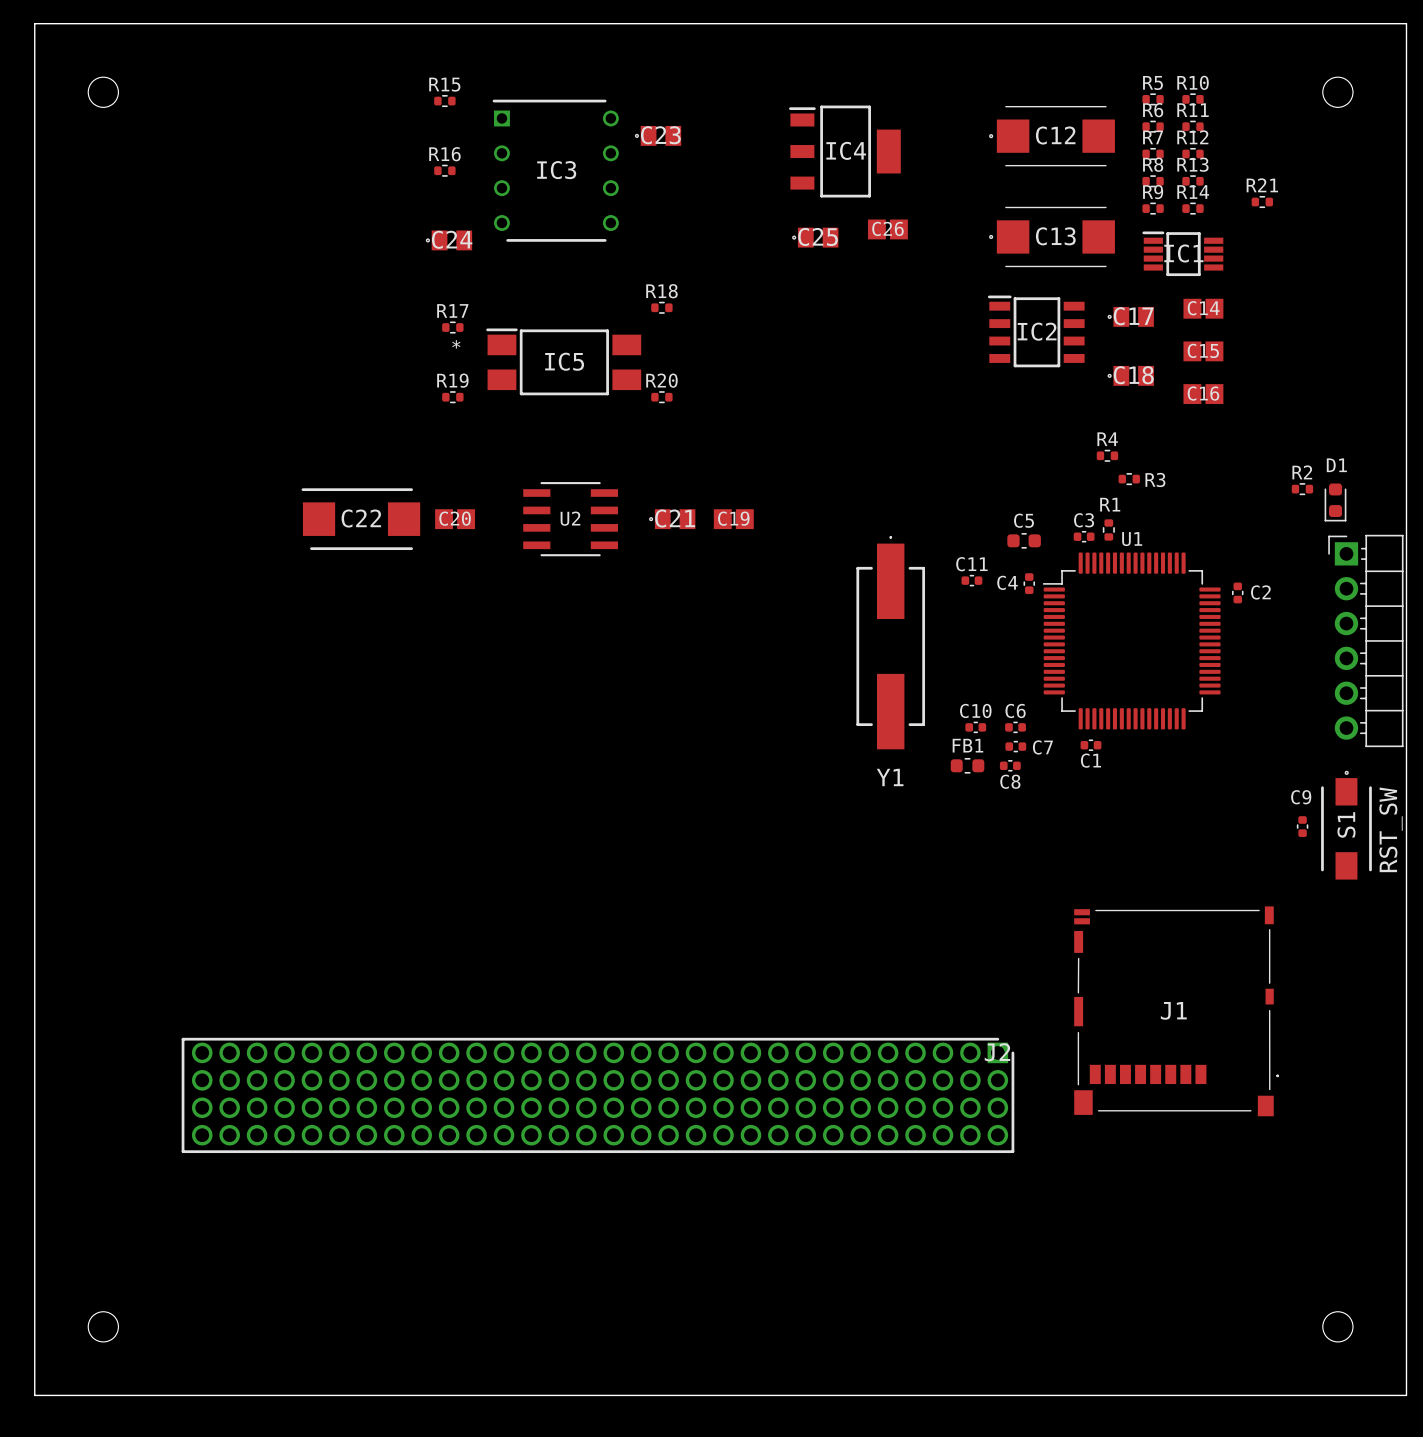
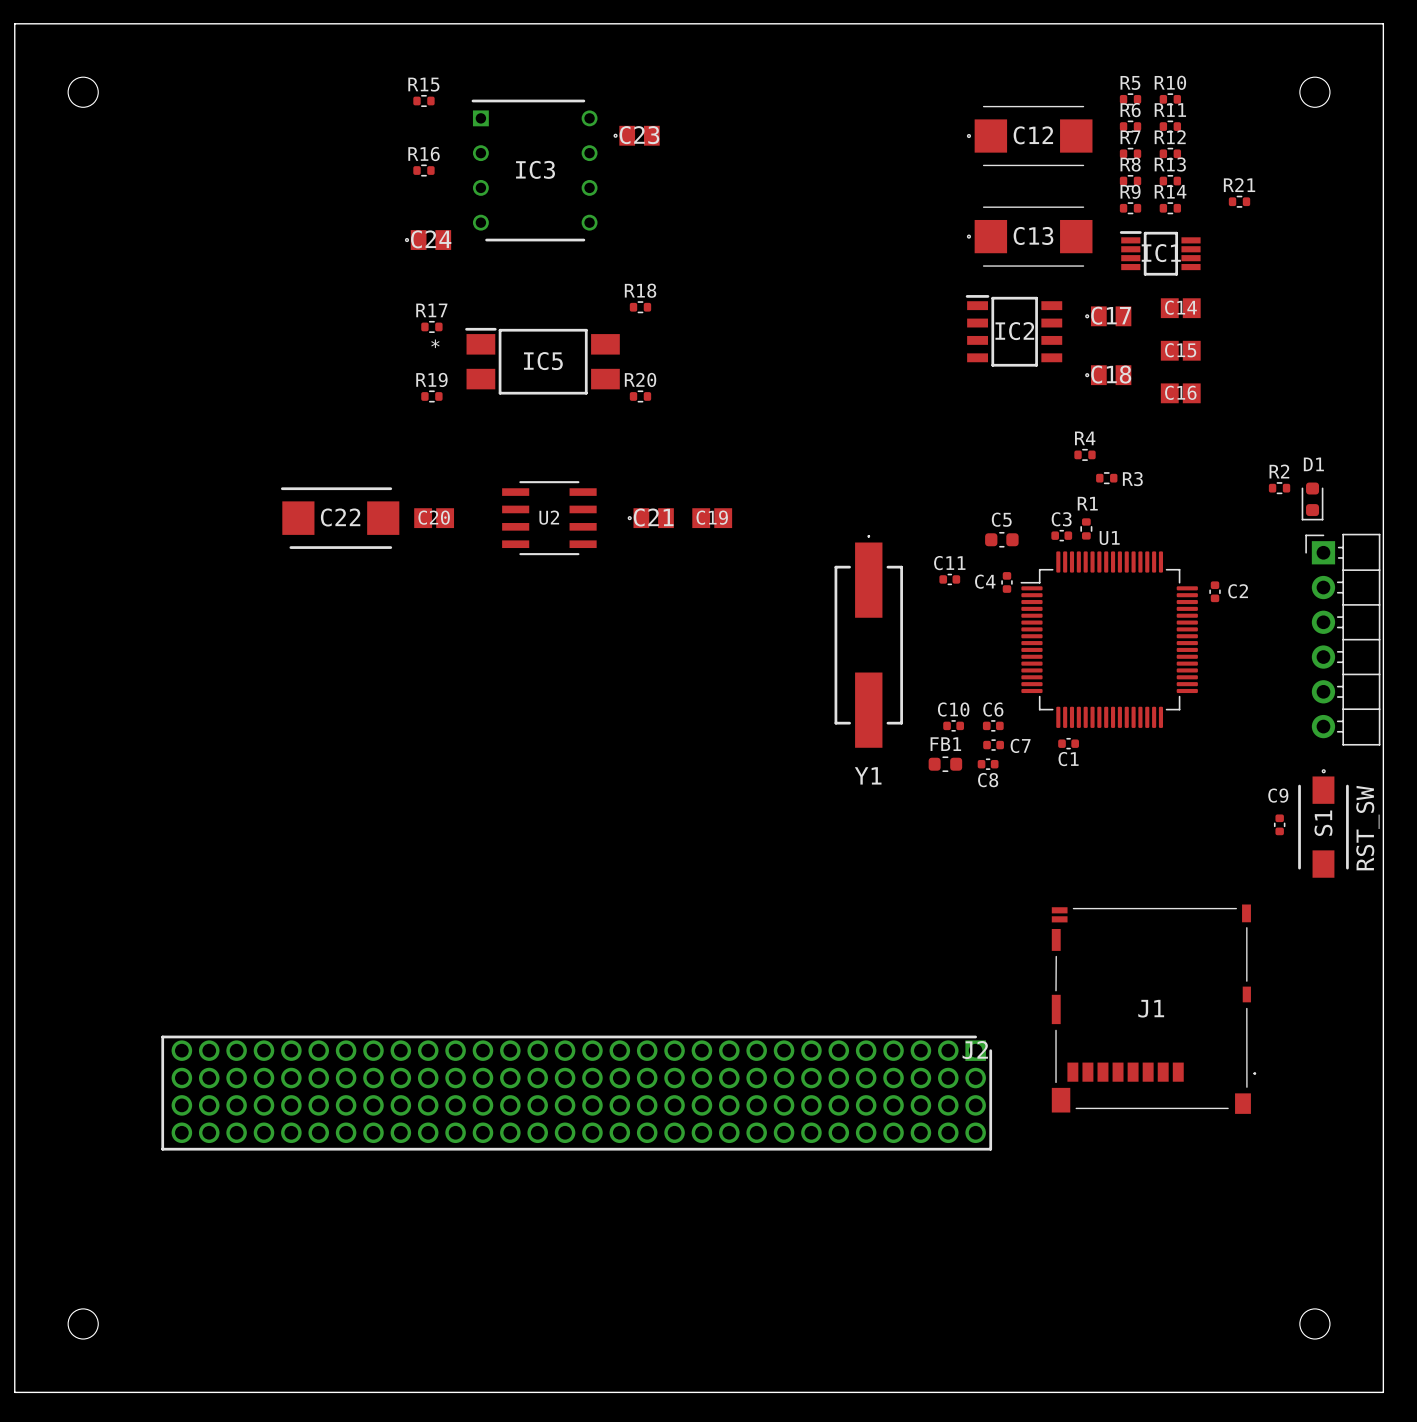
IC4: (844, 151) -> none
C26: (887, 229) -> none
C25: (815, 237) -> none

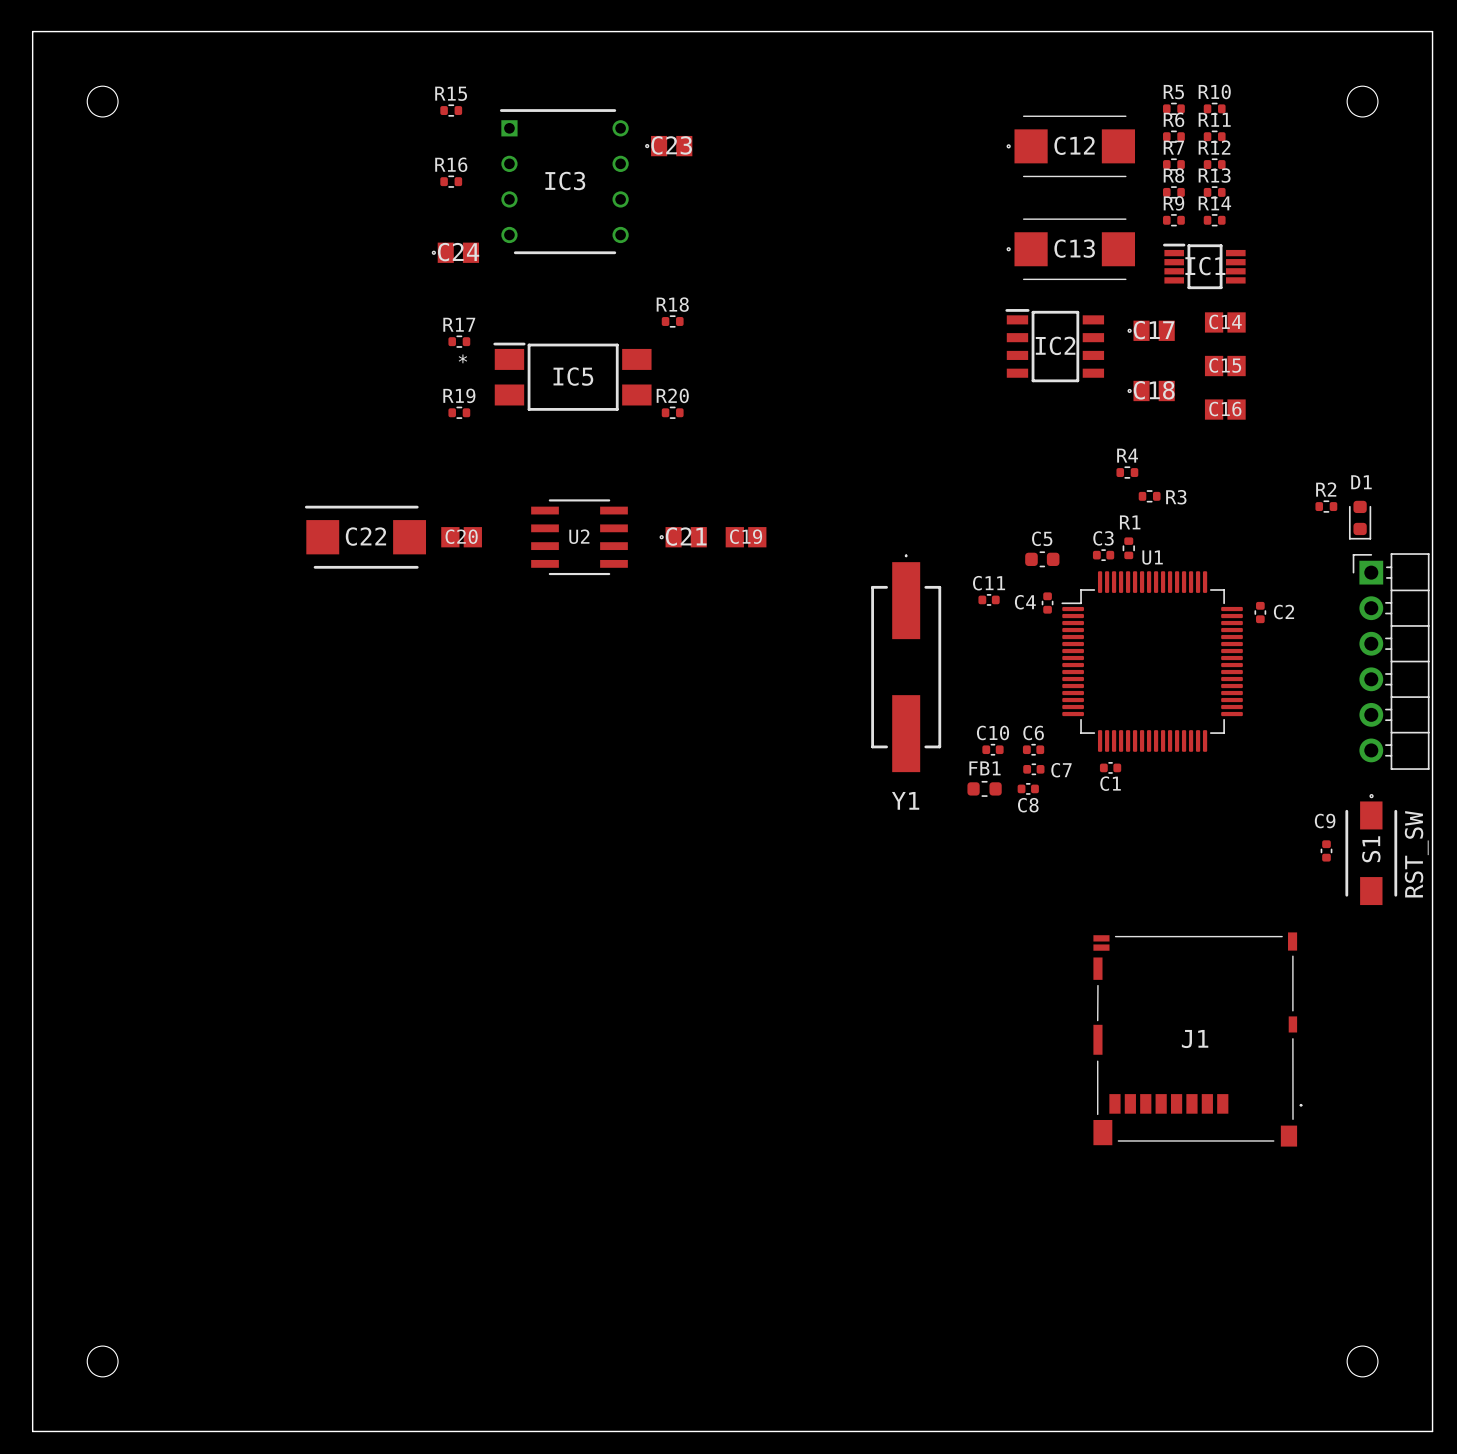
R21: (1239, 201) -> none
J2: (576, 1093) -> none

